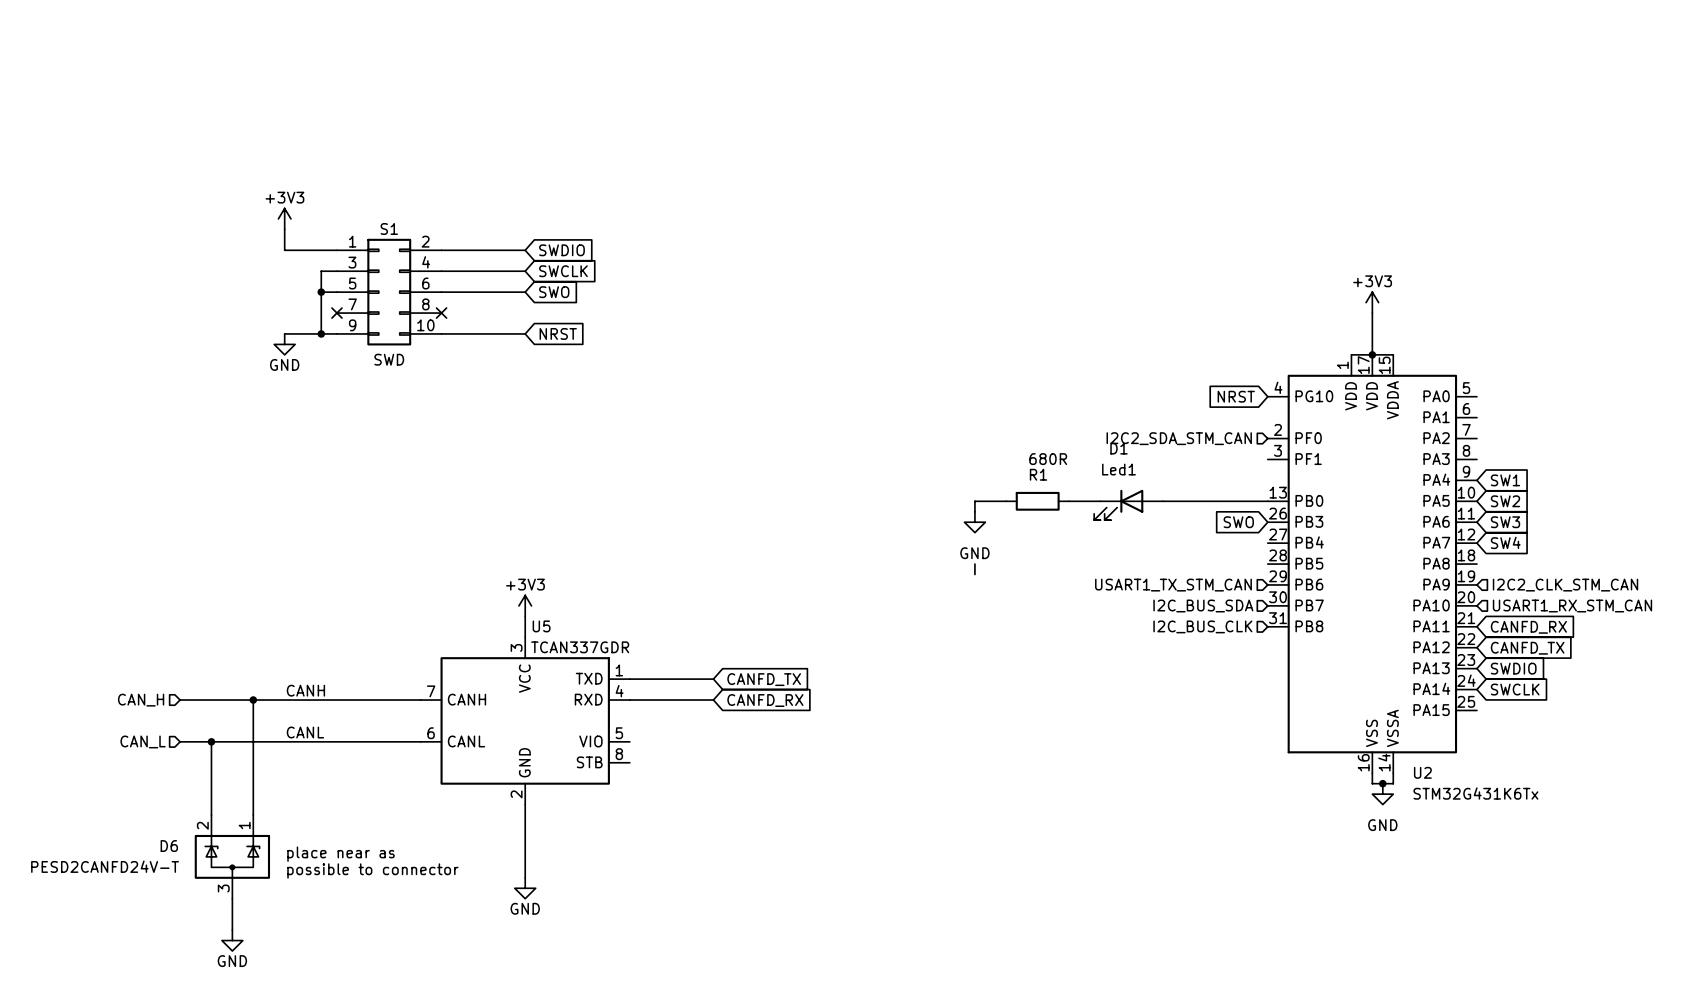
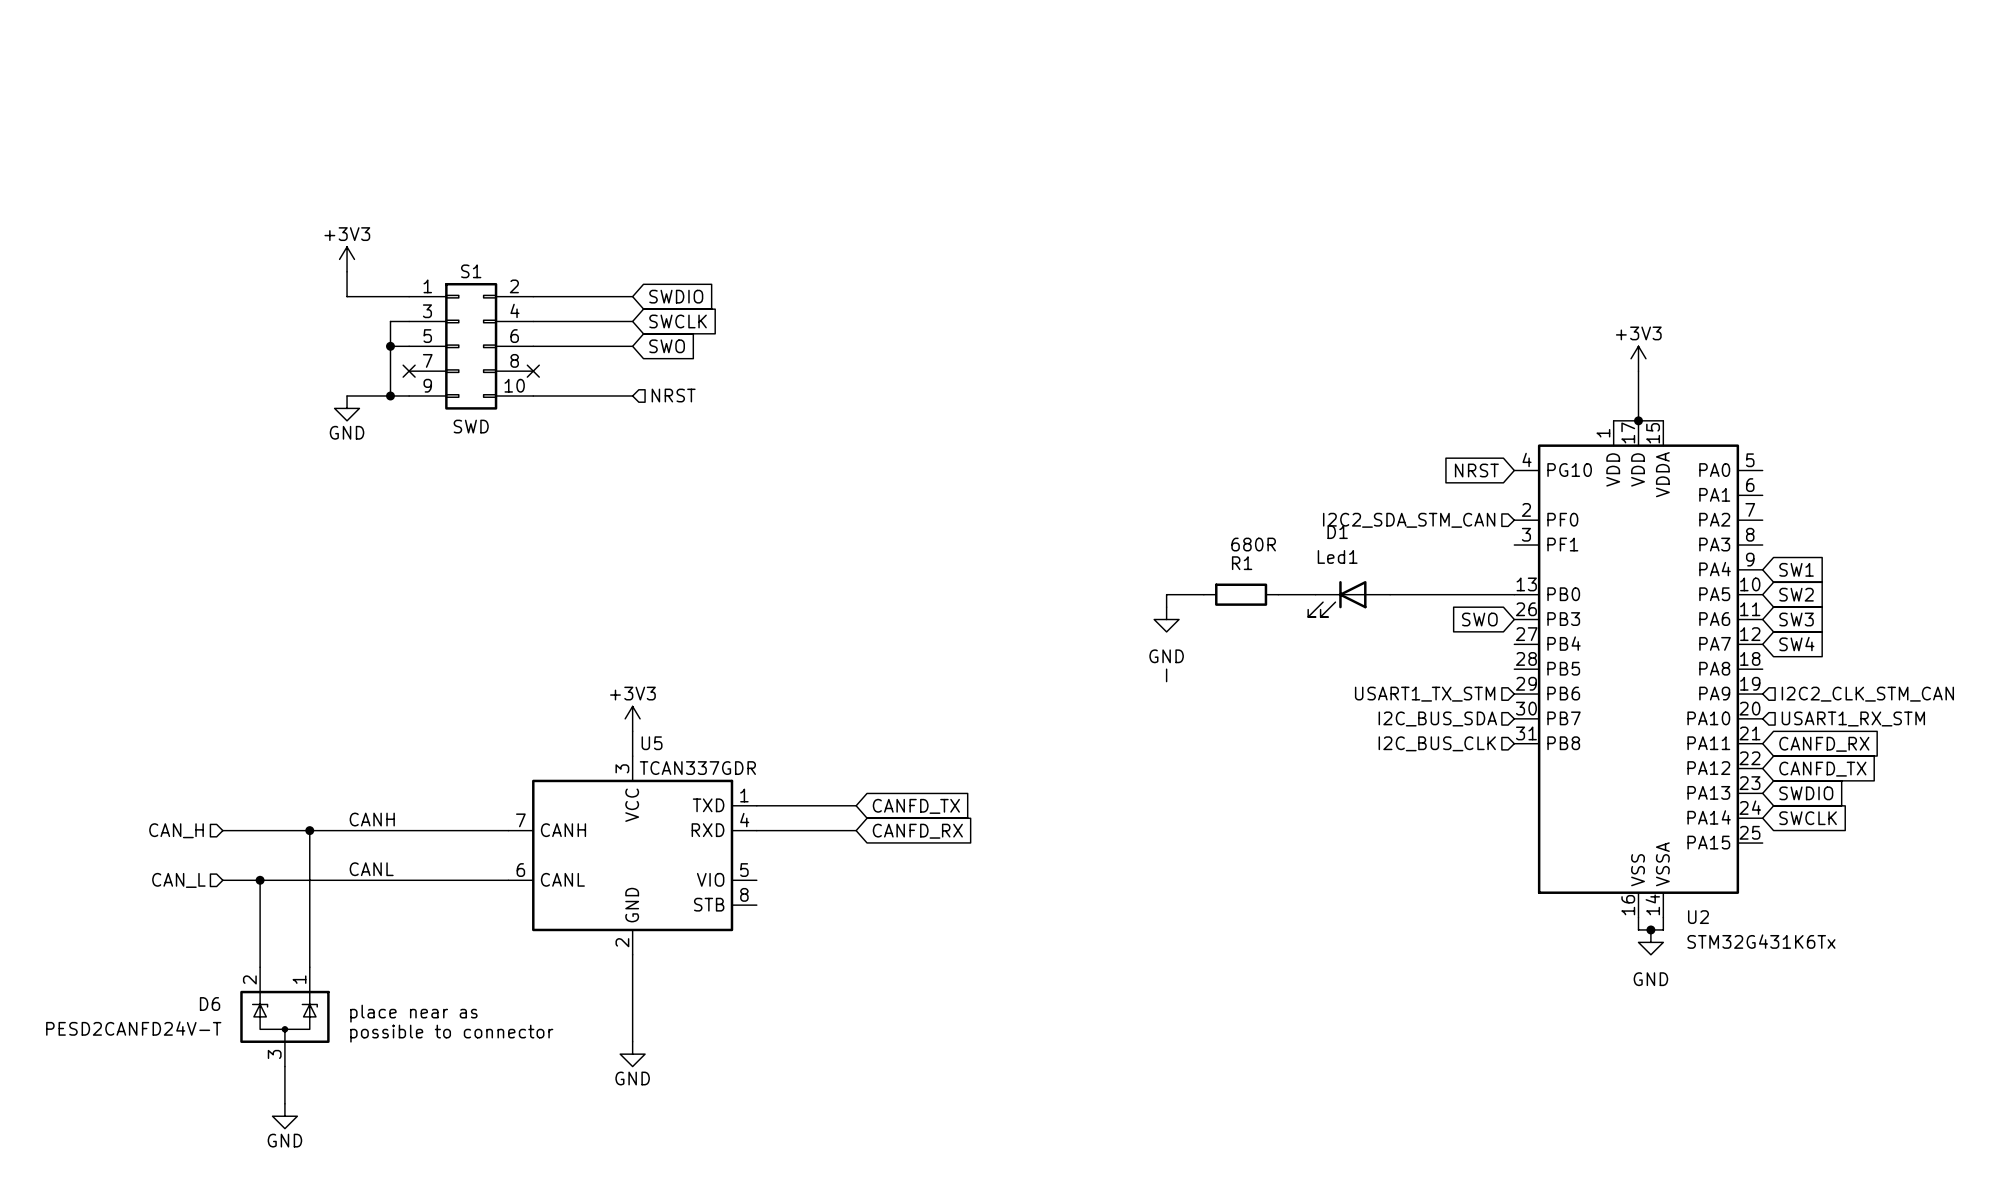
global label: NRST (558, 333) -> none
hierarchical label: none -> NRST (673, 395)
hierarchical label: USART1_TX_STM_CAN (1173, 585) -> USART1_TX_STM (1425, 694)
hierarchical label: USART1_RX_STM_CAN (1572, 605) -> USART1_RX_STM (1853, 718)

